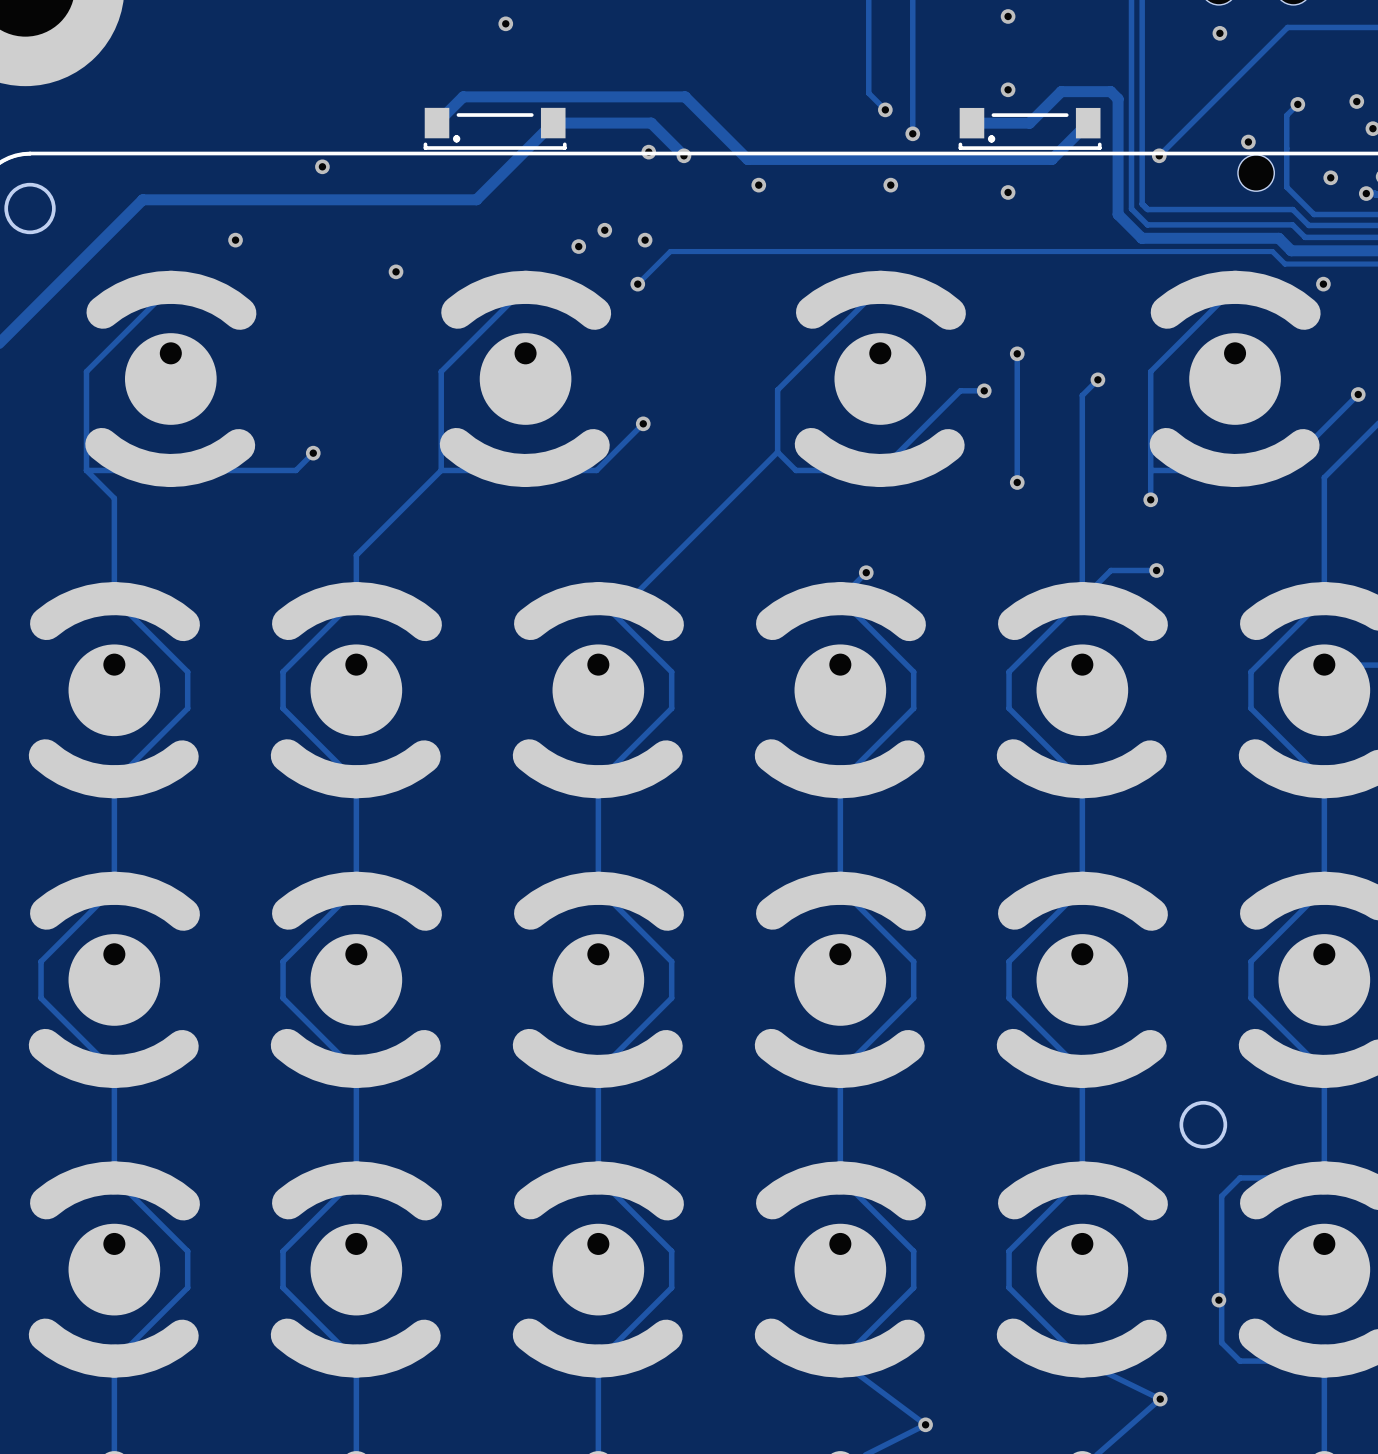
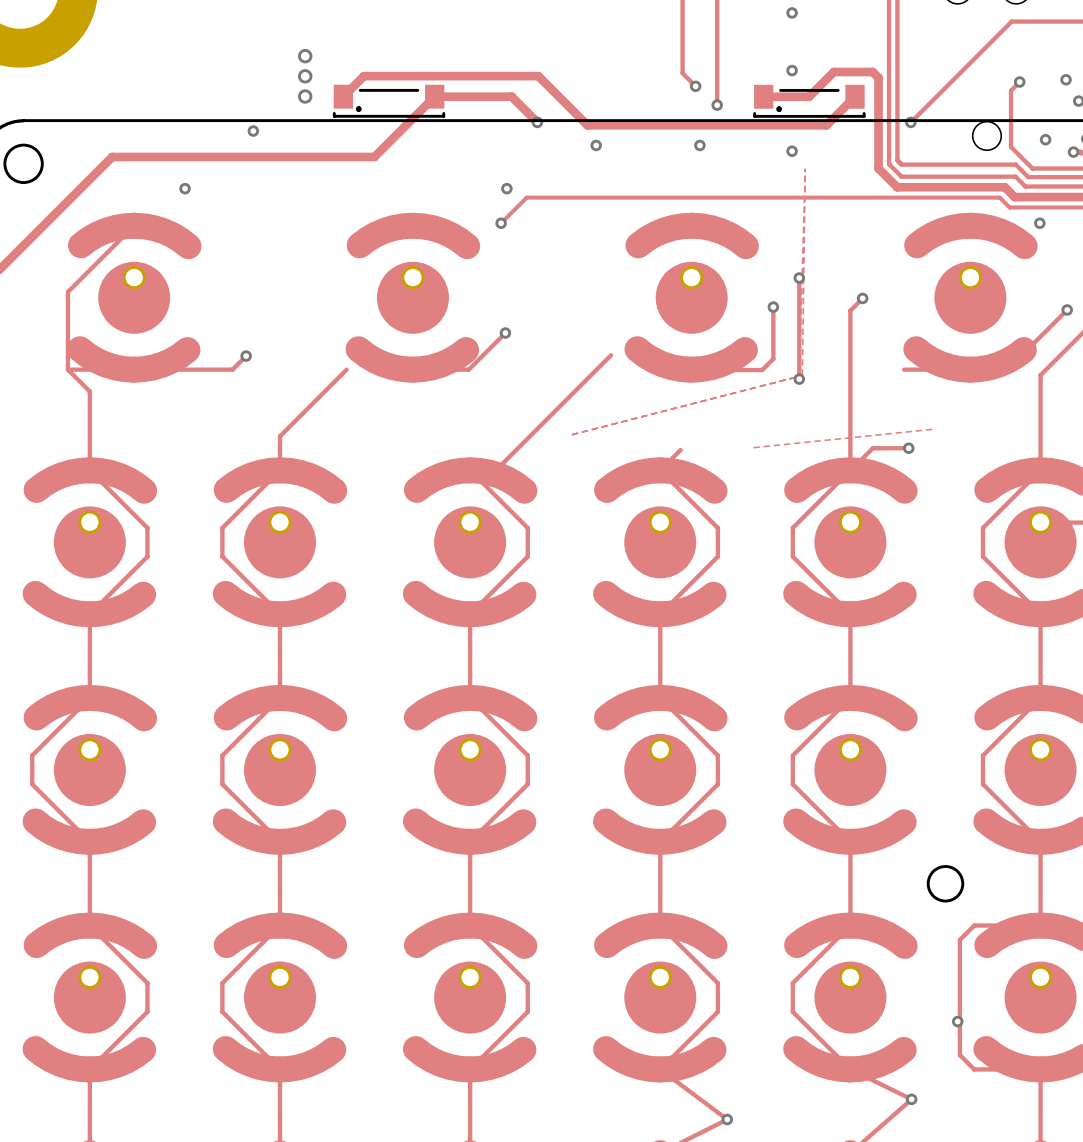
via: (505, 23) -> none
via: (1219, 33) -> none
via: none -> (305, 56)
via: none -> (305, 76)
via: none -> (305, 96)
via: (1248, 142) -> none
via: (648, 152) -> none
zone outline: none -> (805, 168) (799, 376) (571, 434) (802, 375) (805, 168)
via: (604, 230) -> none
via: (578, 246) -> none
via: (396, 271) -> none
track: (525, 287) (441, 371) (441, 470) (525, 470) -> none
track: (880, 287) (777, 390) (777, 452) (795, 470) (880, 470) -> none
track: (1235, 287) (1150, 371) (1150, 499) -> none
track: (984, 390) (960, 390) (880, 470) -> (773, 307) (773, 358) (762, 370) (691, 370)
via: (1150, 499) -> none
zone outline: none -> (936, 428) (753, 447)
via: (866, 572) -> none

